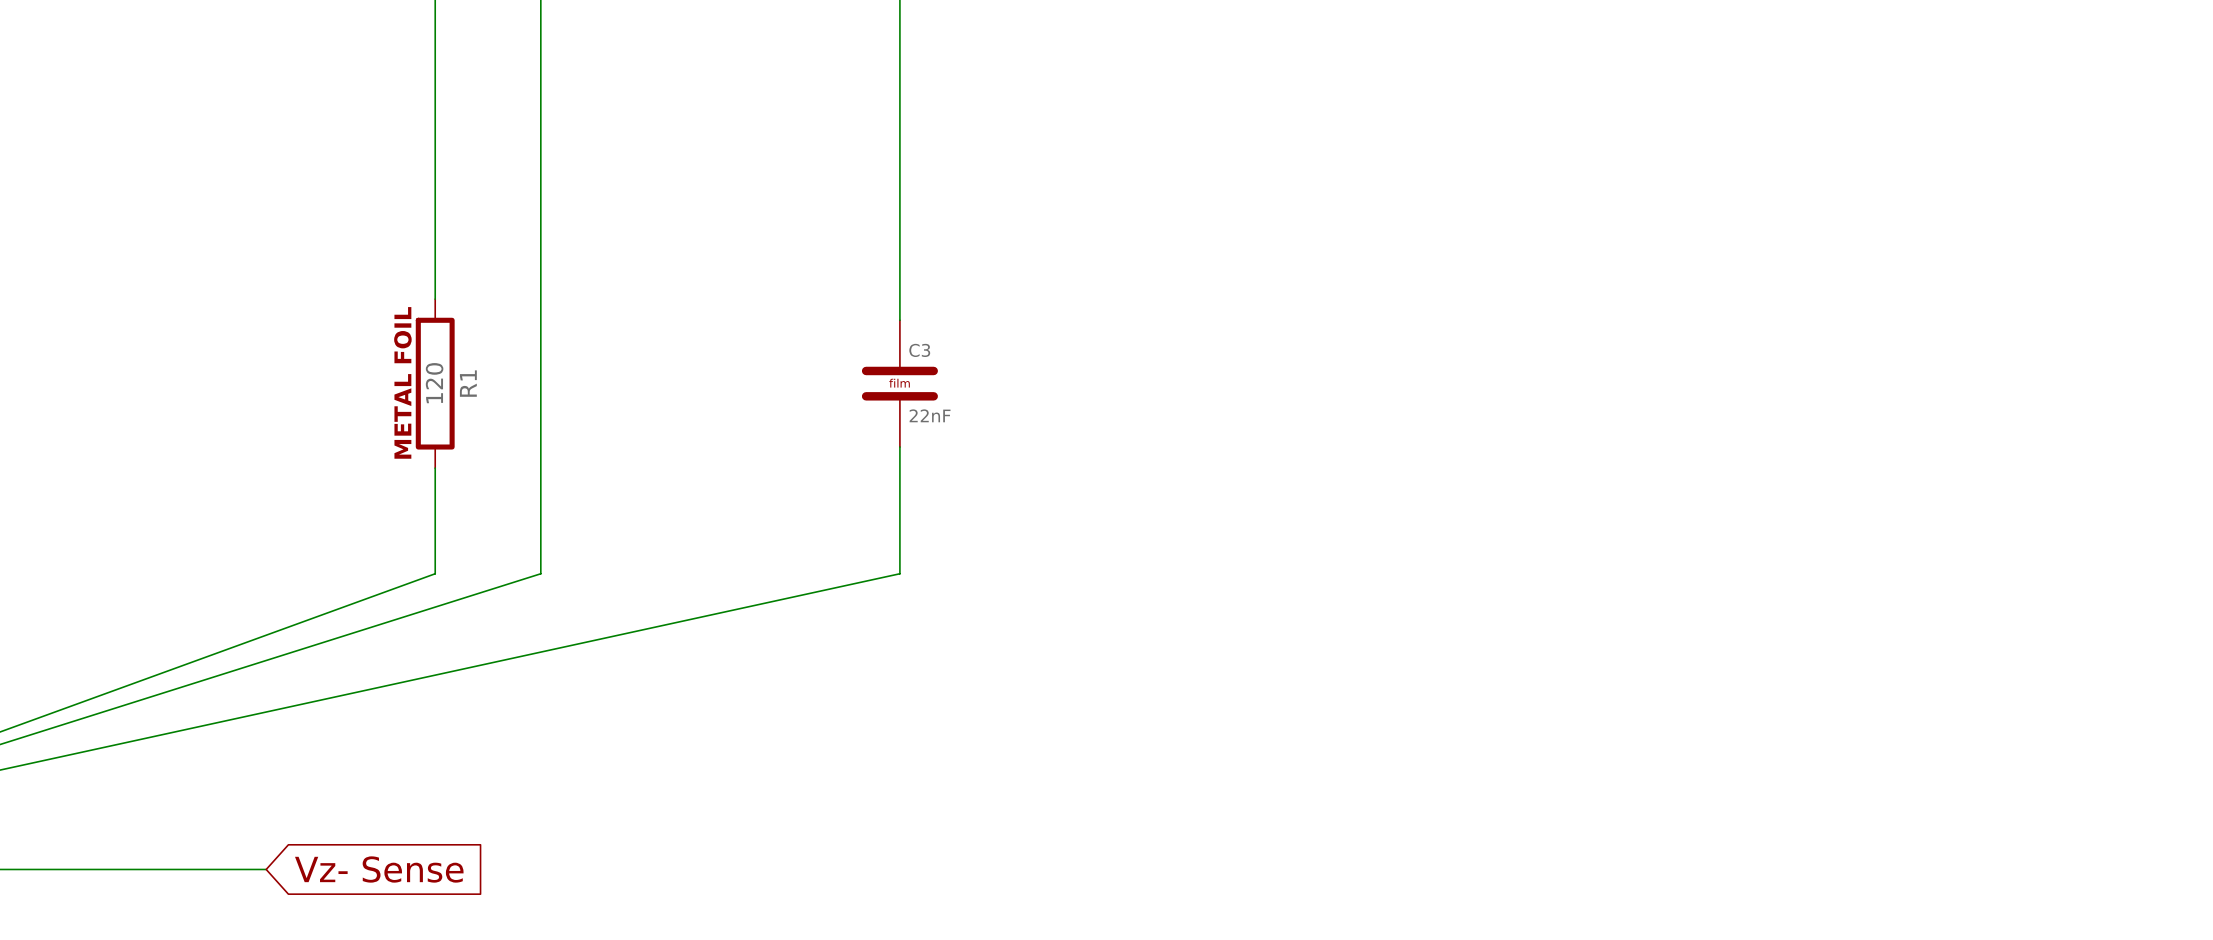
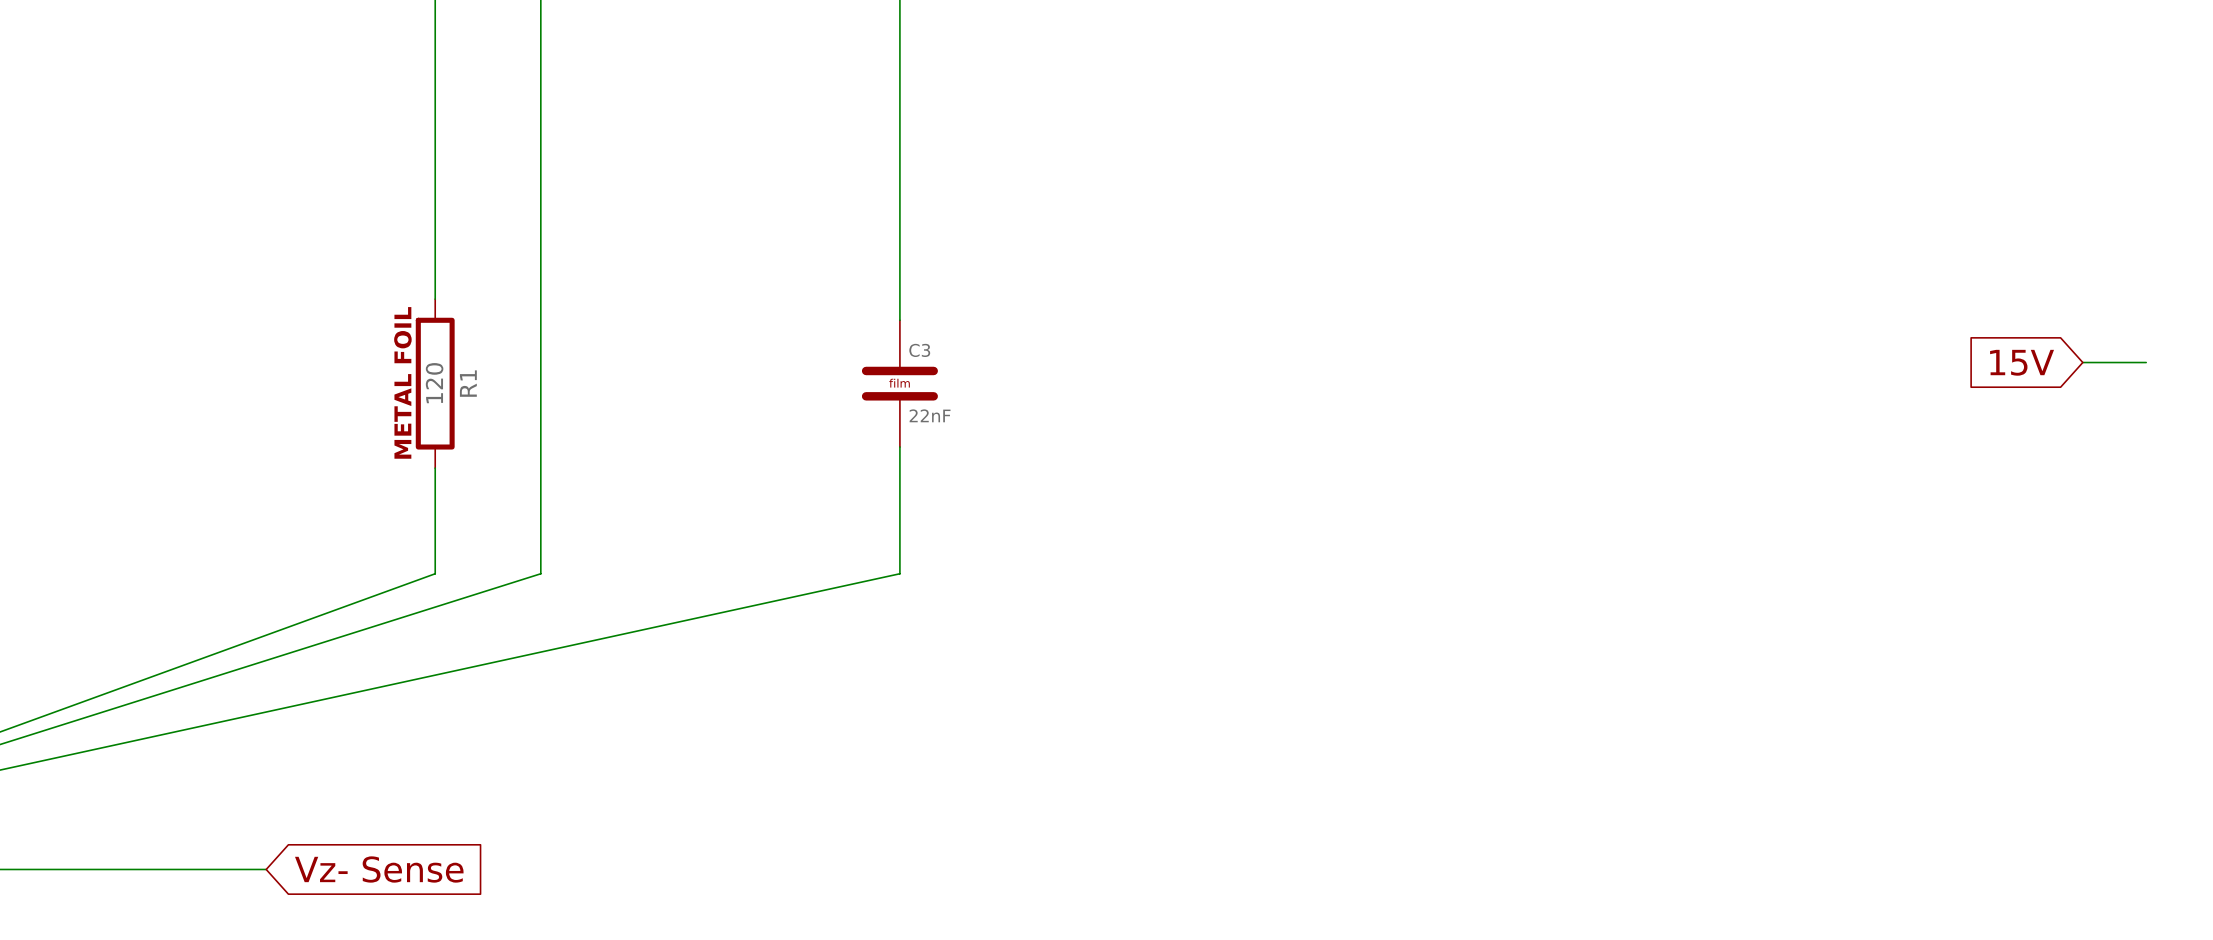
global label: none -> 15V (2022, 362)
wire: none -> (2082, 362) (2146, 362)

